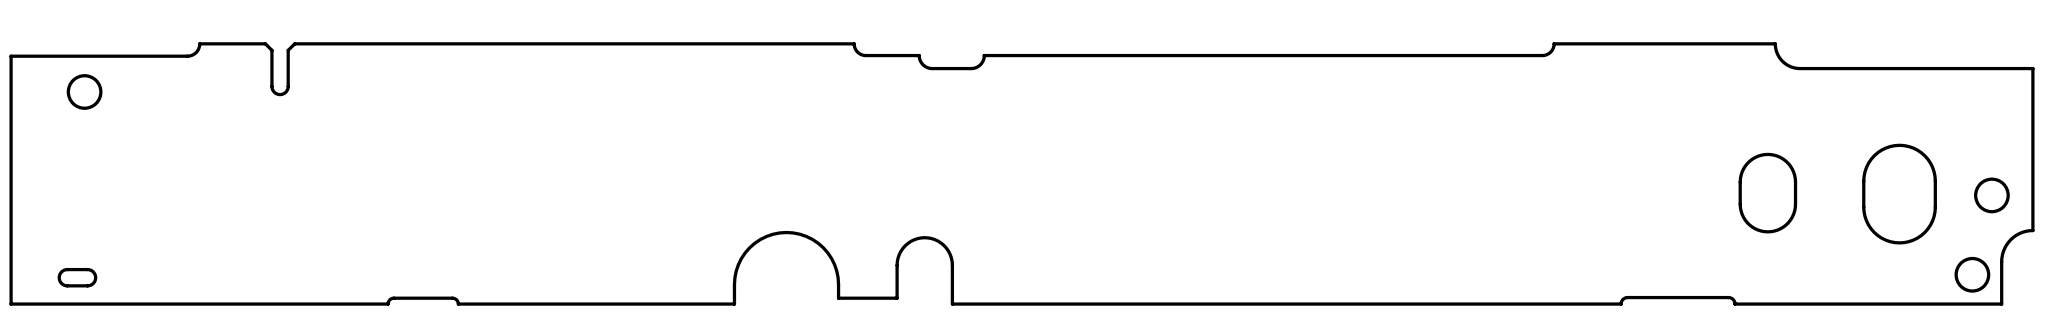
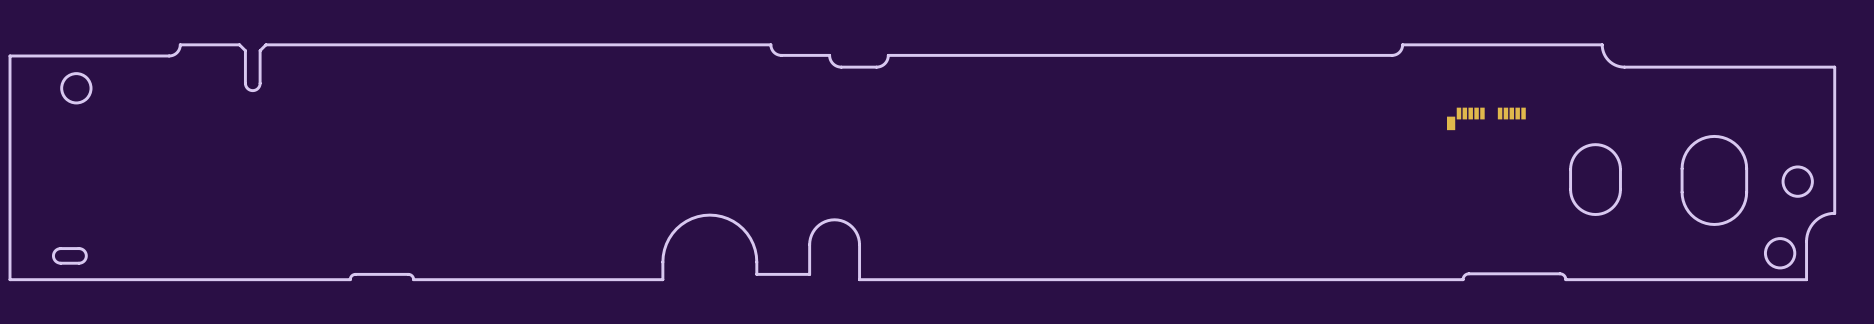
part: none -> (1486, 118)

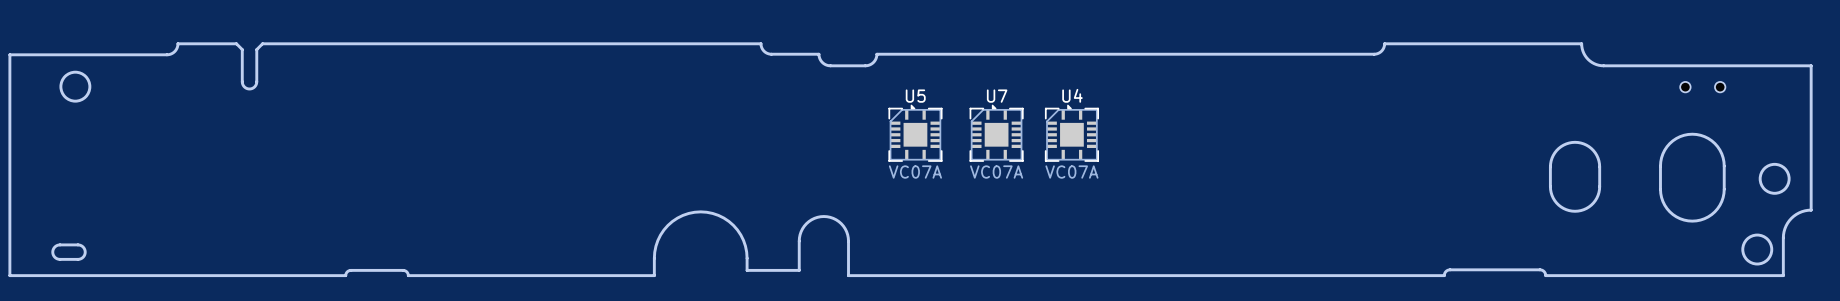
part: none -> (1702, 87)
part: (1486, 118) -> none
U5: none -> VC07A (915, 133)
U7: none -> VC07A (996, 133)
U4: none -> VC07A (1071, 133)

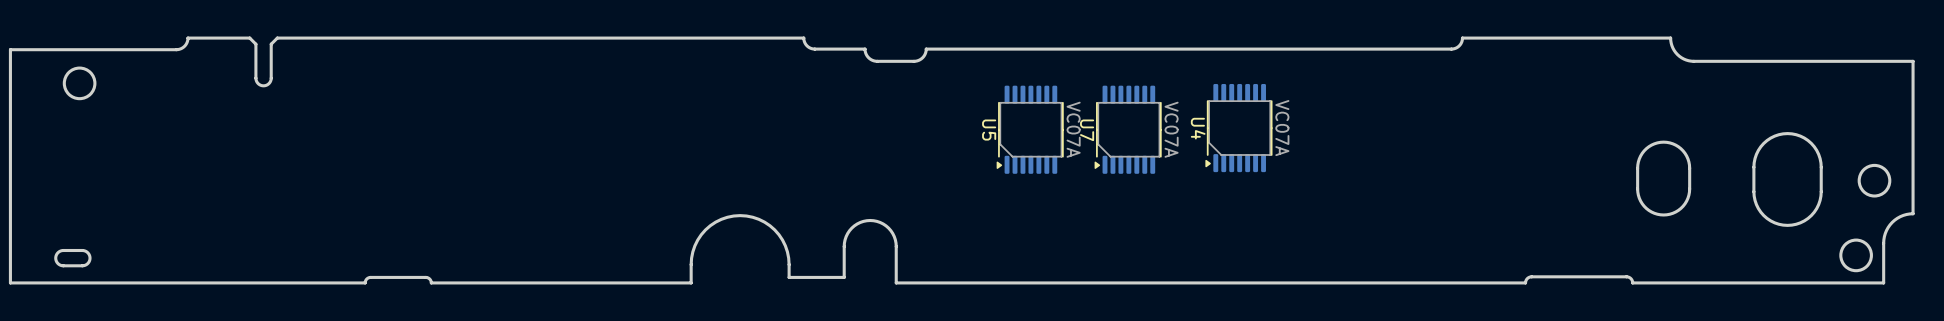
part: (1702, 87) -> none
U4 name position: U4 (1072, 95) -> U4 (1198, 128)
U5 name position: U5 (915, 96) -> U5 (989, 130)
U7 name position: U7 (997, 96) -> U7 (1087, 130)
U5 footprint: [888, 104, 943, 162] -> [996, 85, 1064, 174]
U7 footprint: [969, 104, 1024, 162] -> [1094, 85, 1162, 174]
U4 footprint: [1045, 104, 1099, 162] -> [1205, 83, 1273, 173]
U5 value position: VC07A (915, 172) -> VC07A (1073, 129)
U7 value position: VC07A (996, 172) -> VC07A (1171, 129)
U4 value position: VC07A (1071, 172) -> VC07A (1282, 128)

